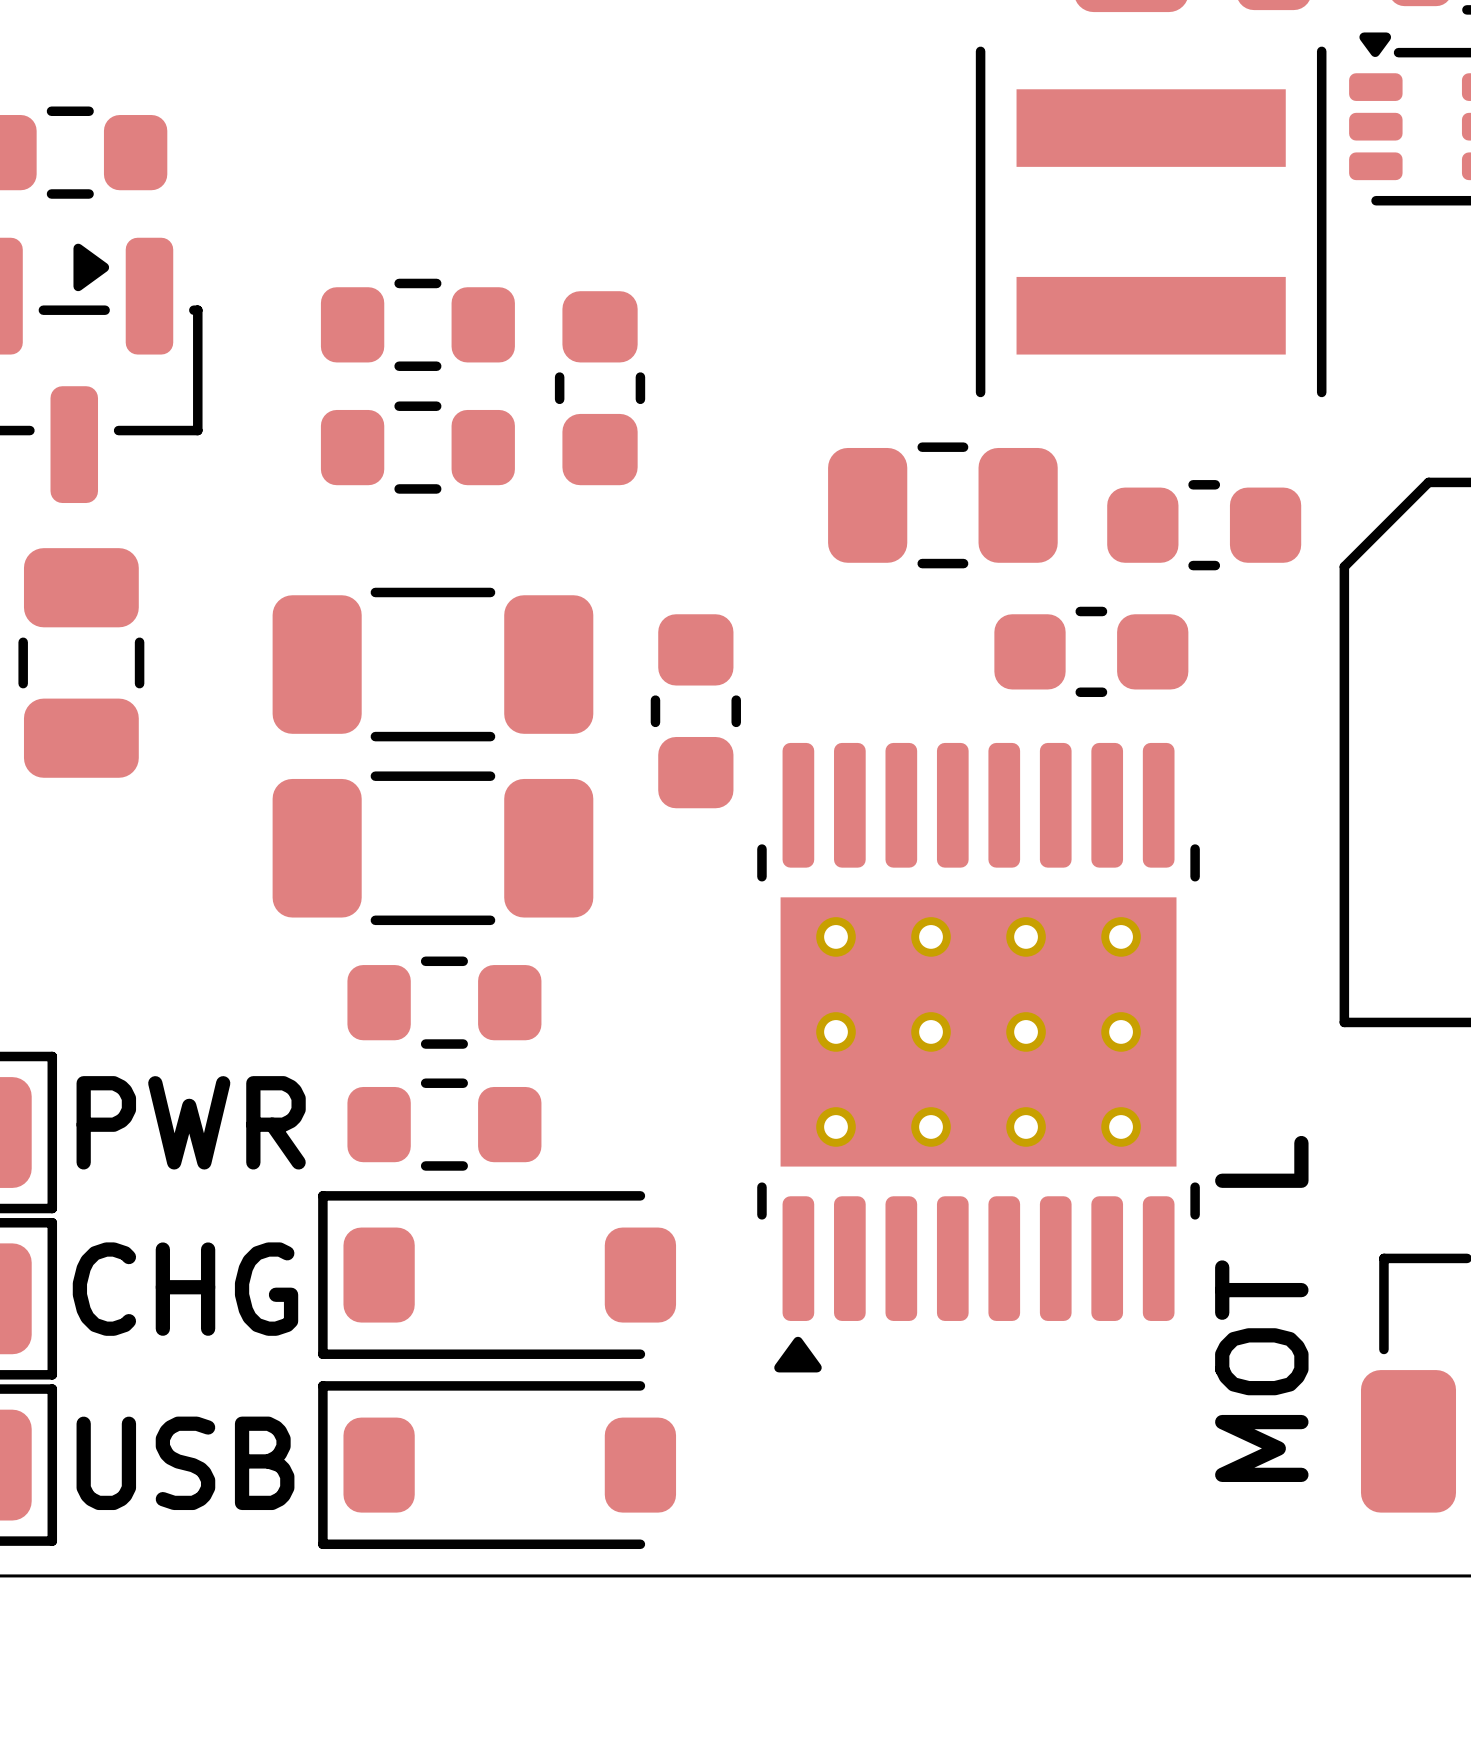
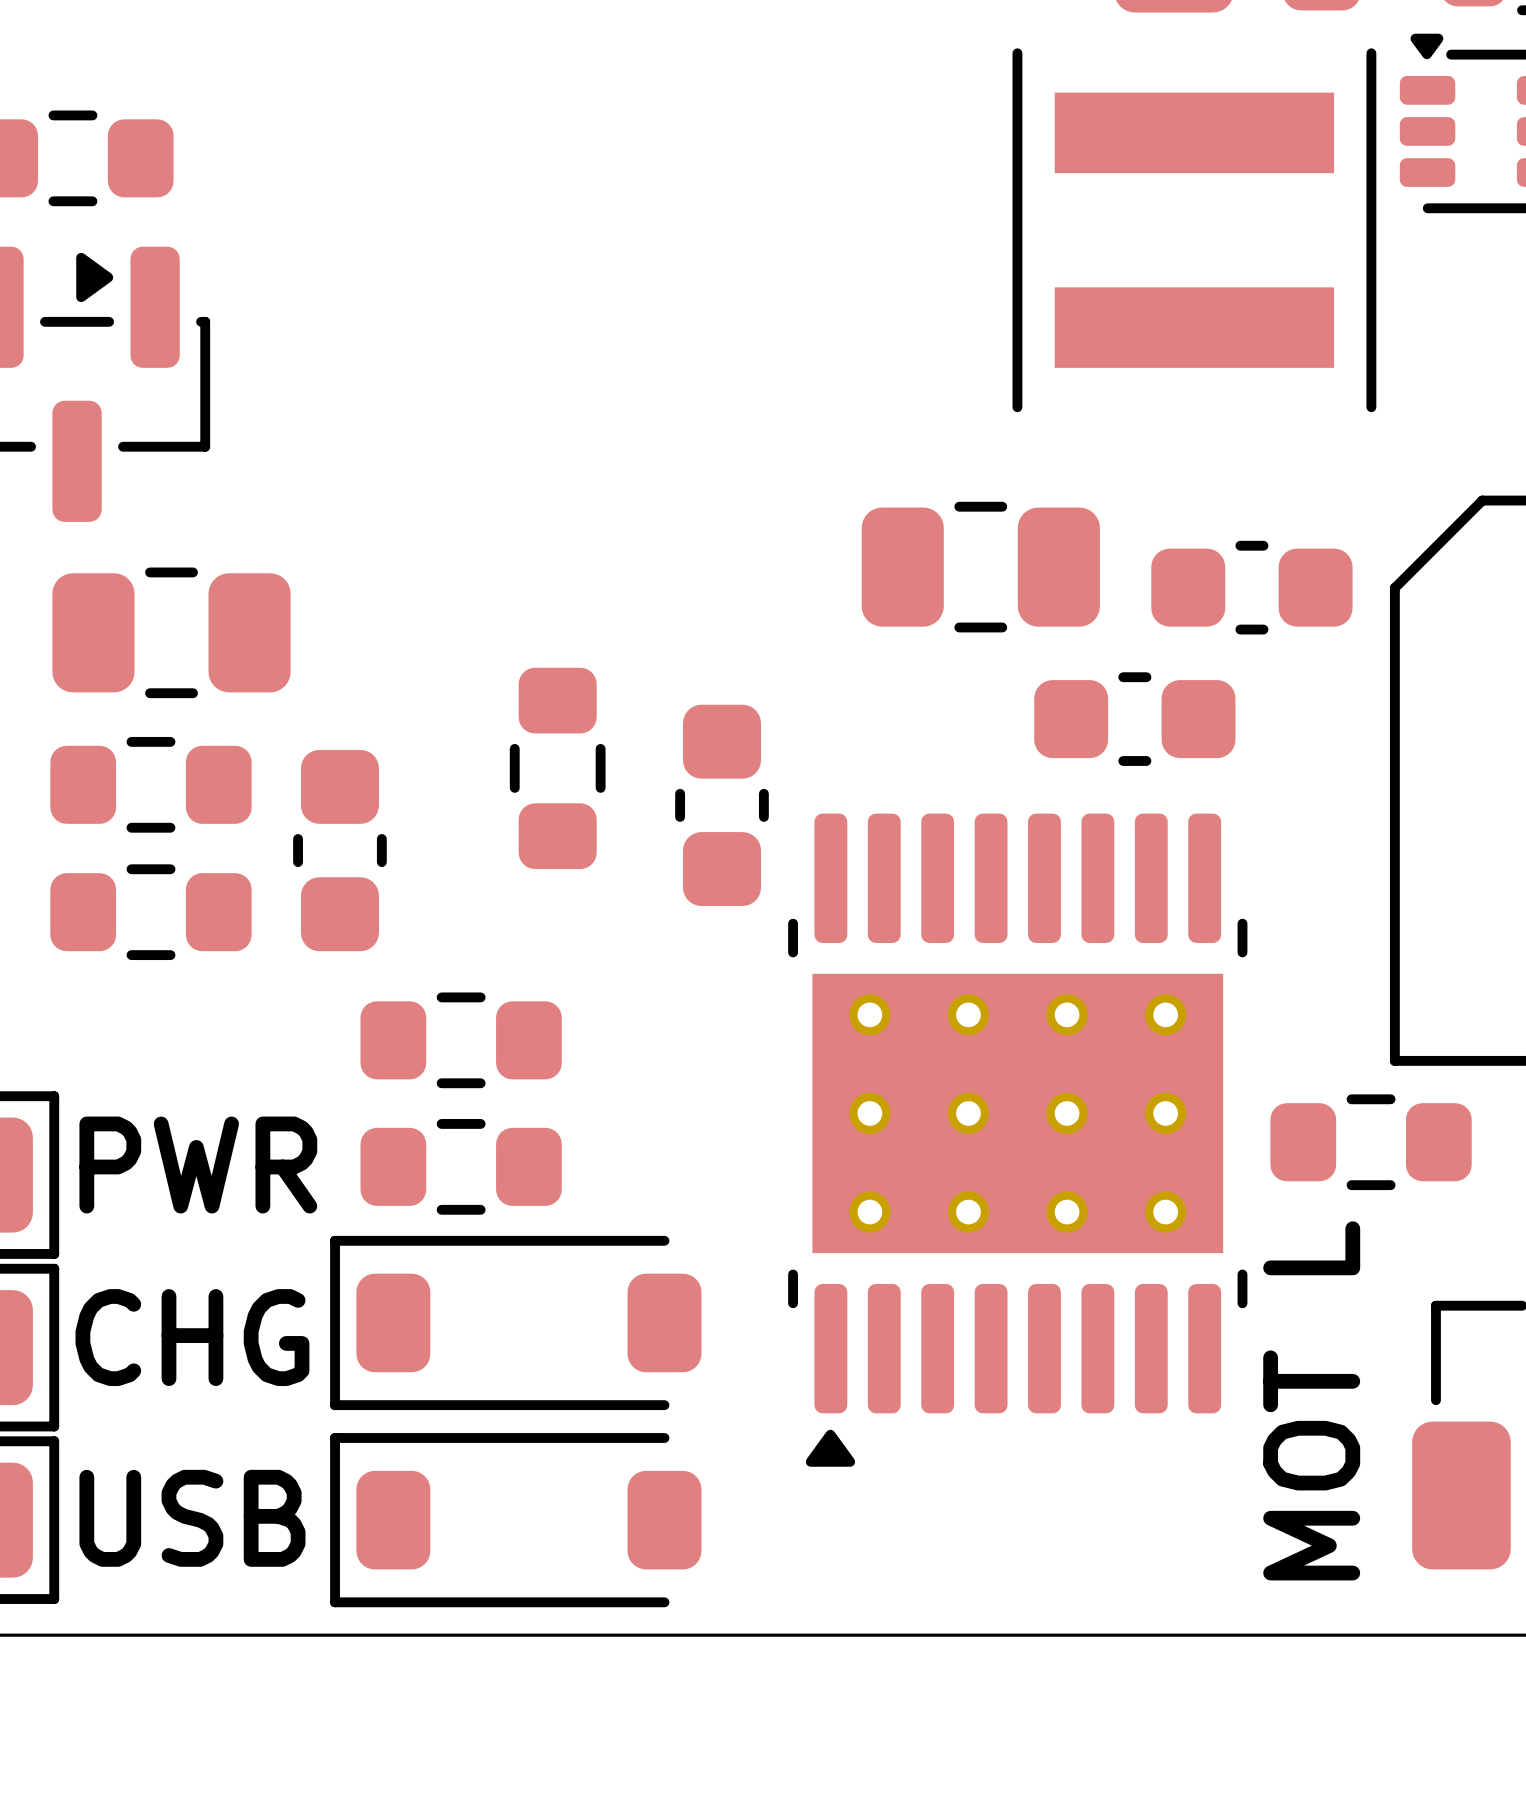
part: (417, 324) -> none
part position: (600, 388) -> (339, 850)
part: (417, 447) -> none
part position: (942, 505) -> (980, 567)
part position: (1204, 525) -> (1251, 587)
part position: (1091, 651) -> (1134, 719)
part rotation: 0° (81, 662) -> 90° clockwise (171, 632)
part: (432, 664) -> none
part position: (695, 711) -> (722, 805)
part: none -> (557, 768)
part: none -> (150, 784)
part: (432, 848) -> none
part: none -> (150, 912)
part position: (978, 1057) -> (1017, 1140)
part: none -> (1371, 1142)
text position: MOT L (1261, 1308) -> MOT L (1311, 1400)

